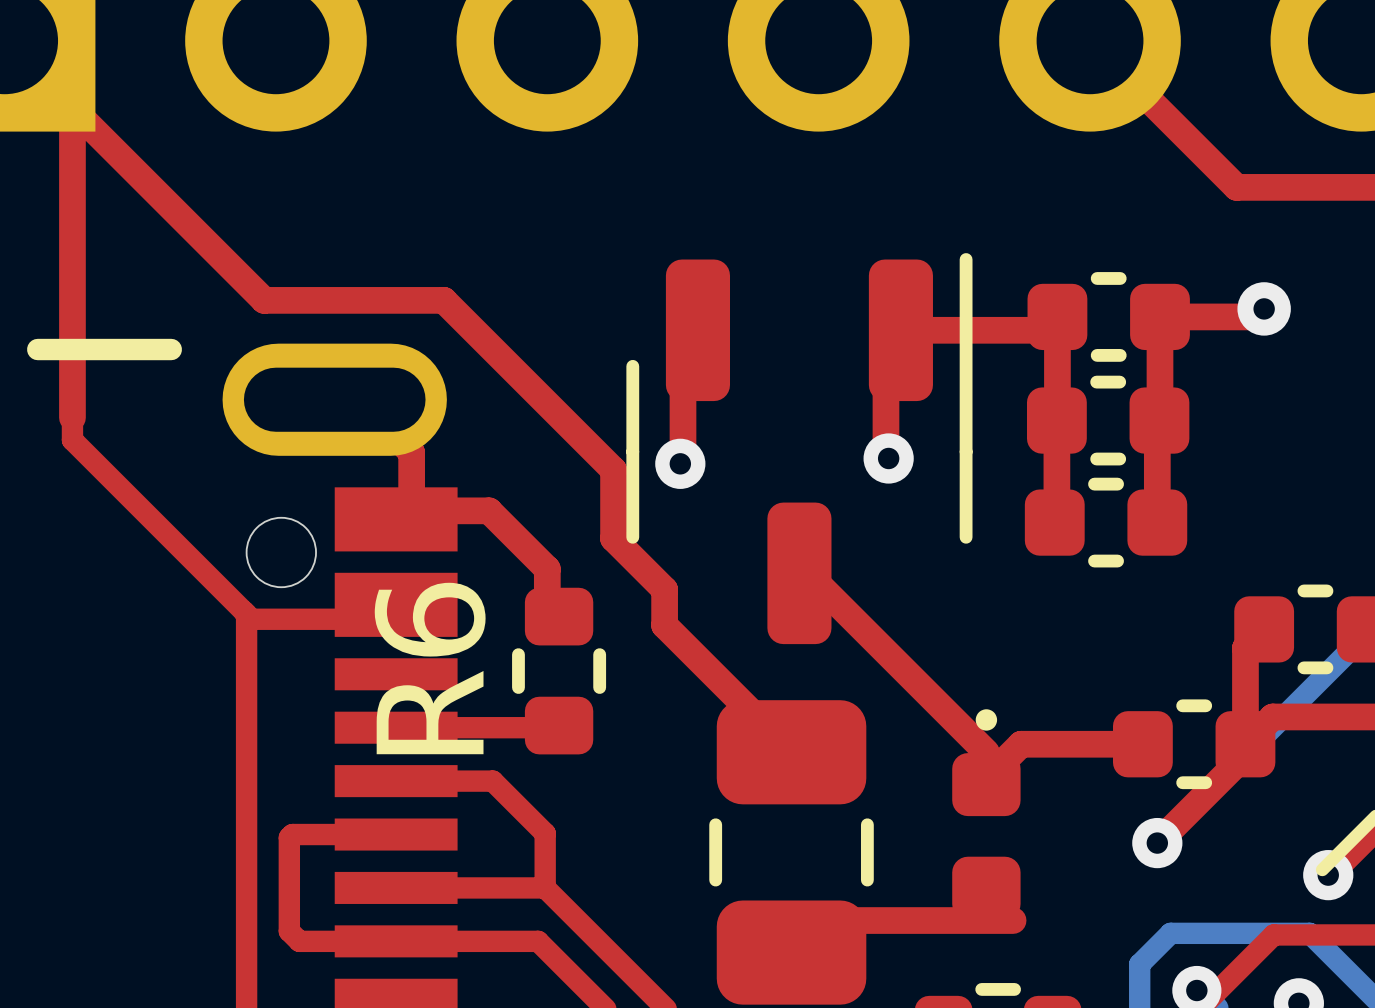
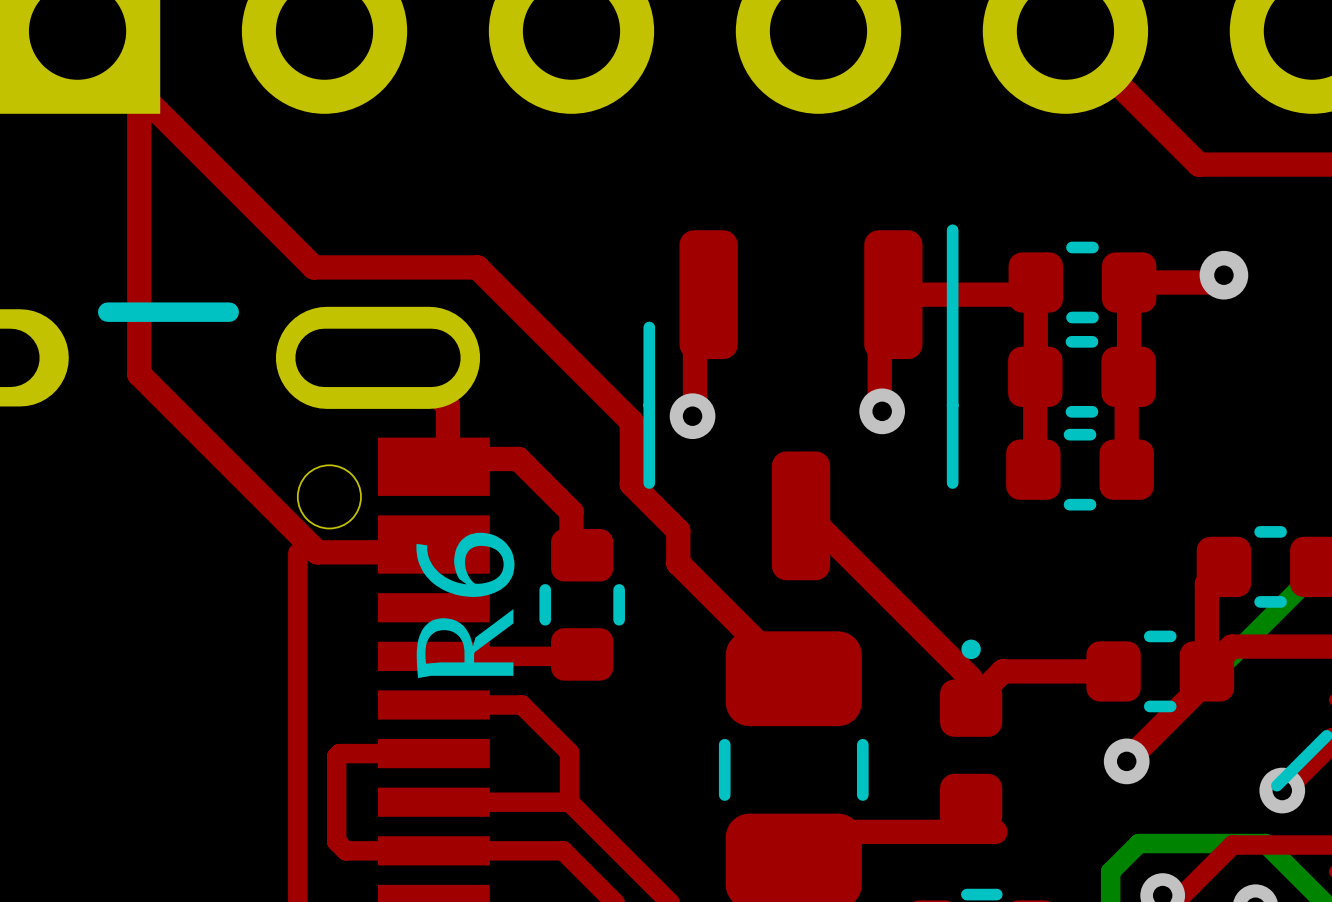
top track: (72, 417) (72, 440) (251, 619) (390, 619) (404, 604) -> (139, 374) (317, 552) (432, 552)

